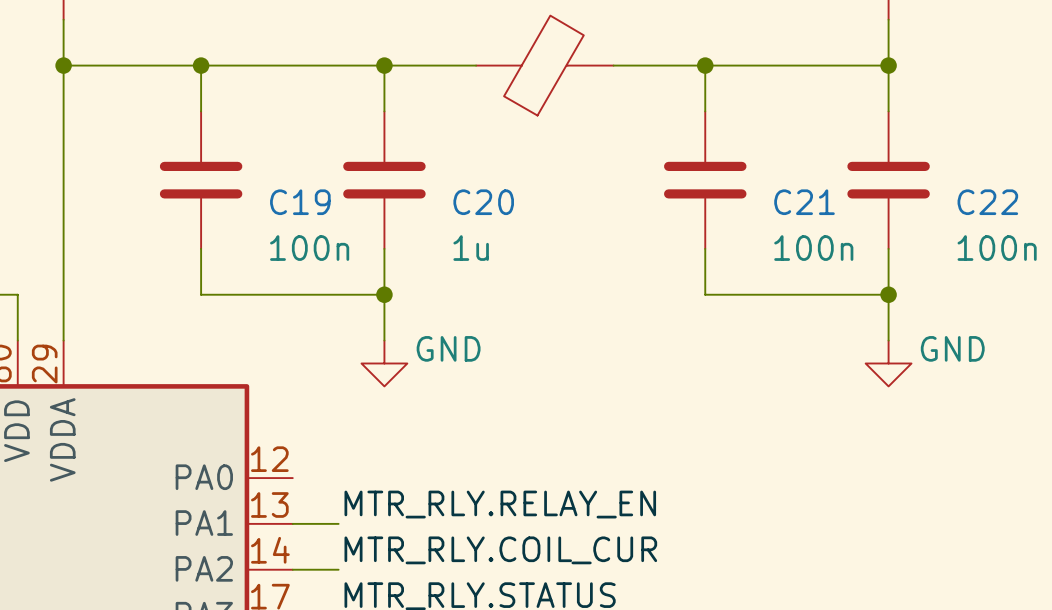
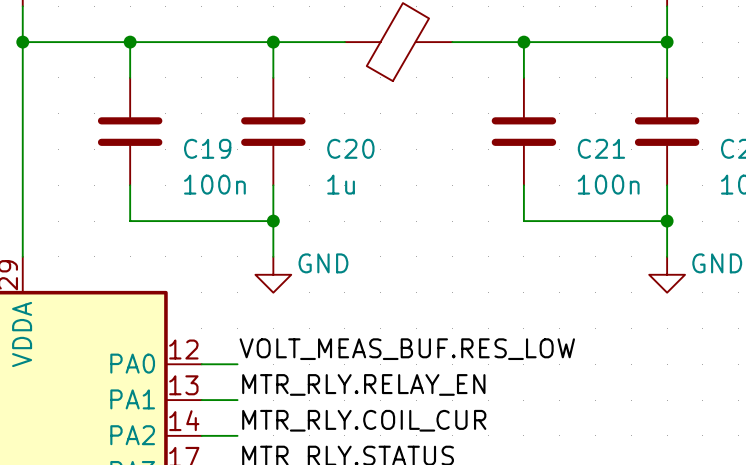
label: none -> VOLT_MEAS_BUF.RES_LOW (407, 349)
wire: none -> (201, 364) (237, 364)

